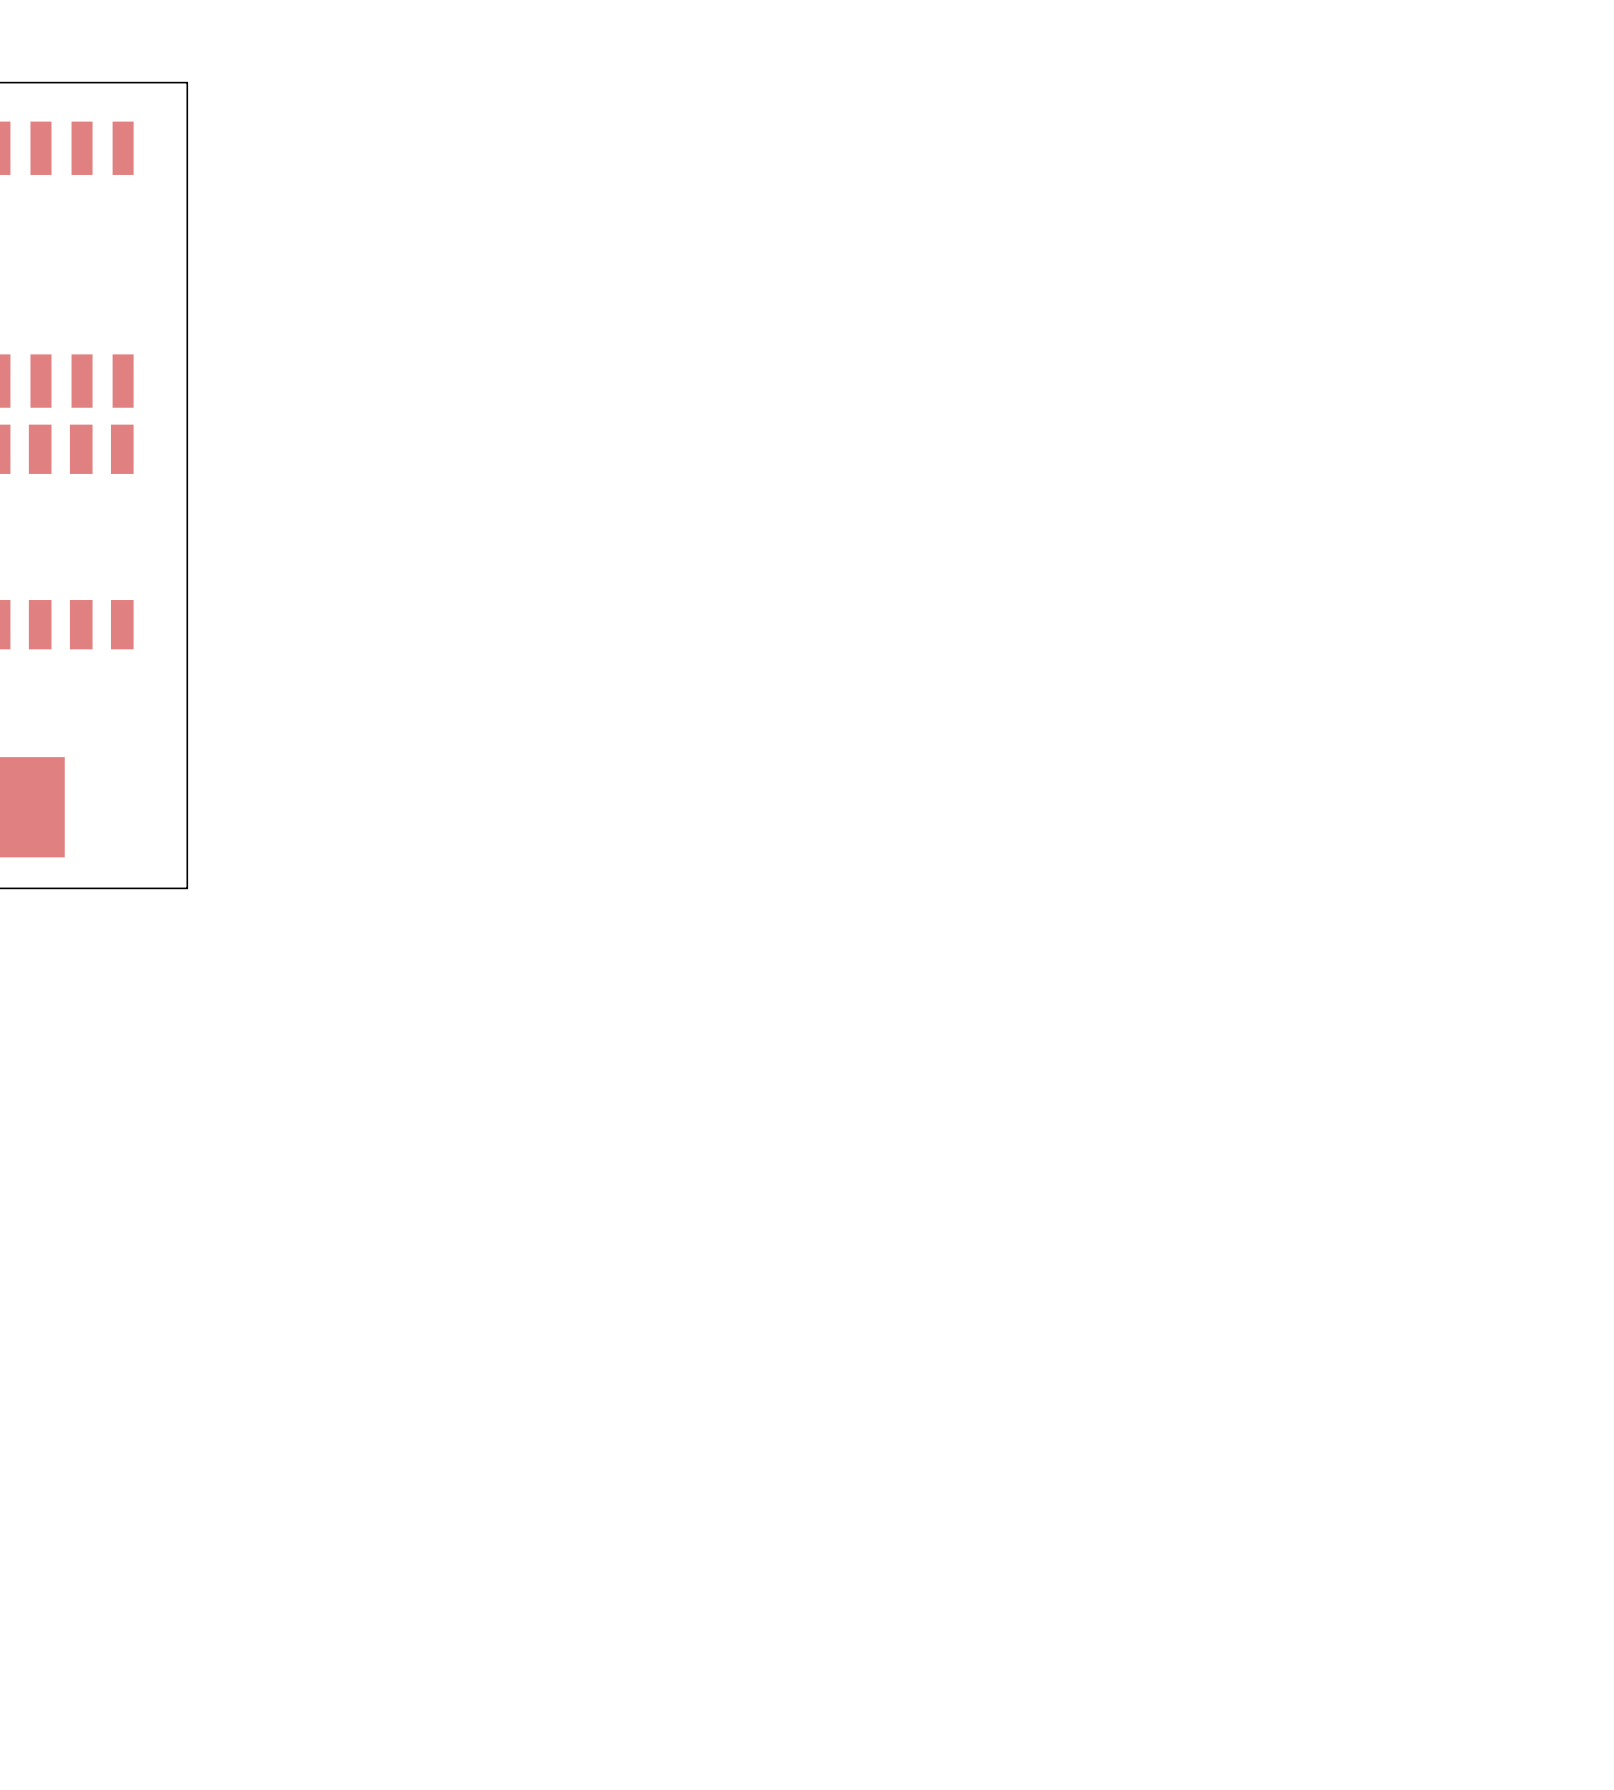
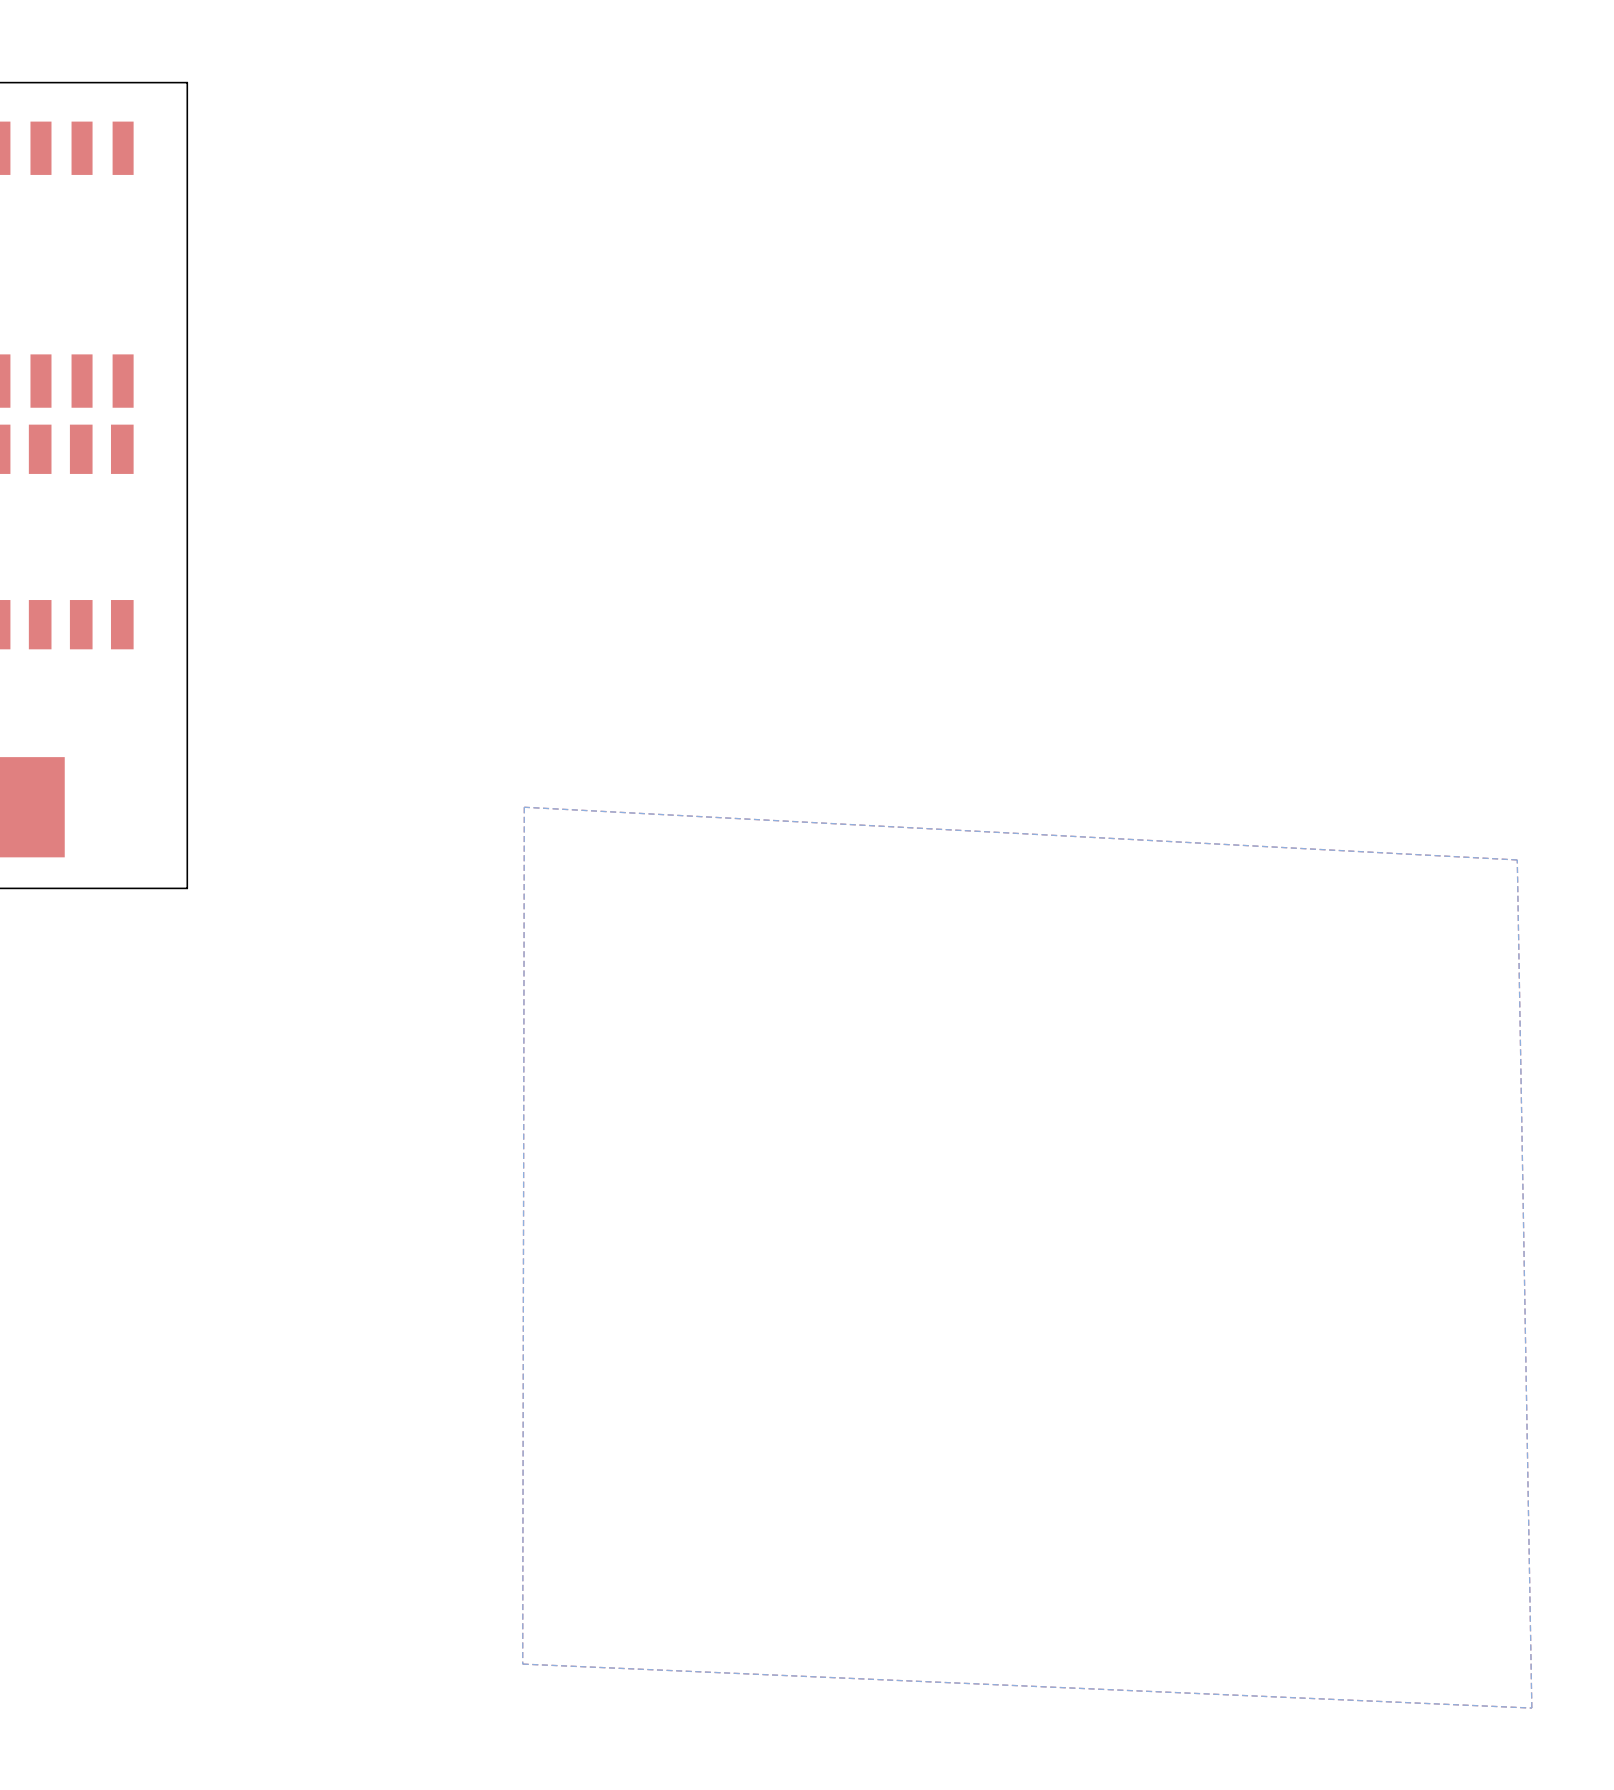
bottom zone outline: none -> (524, 807) (1517, 859) (1531, 1708) (522, 1664) (524, 807)

